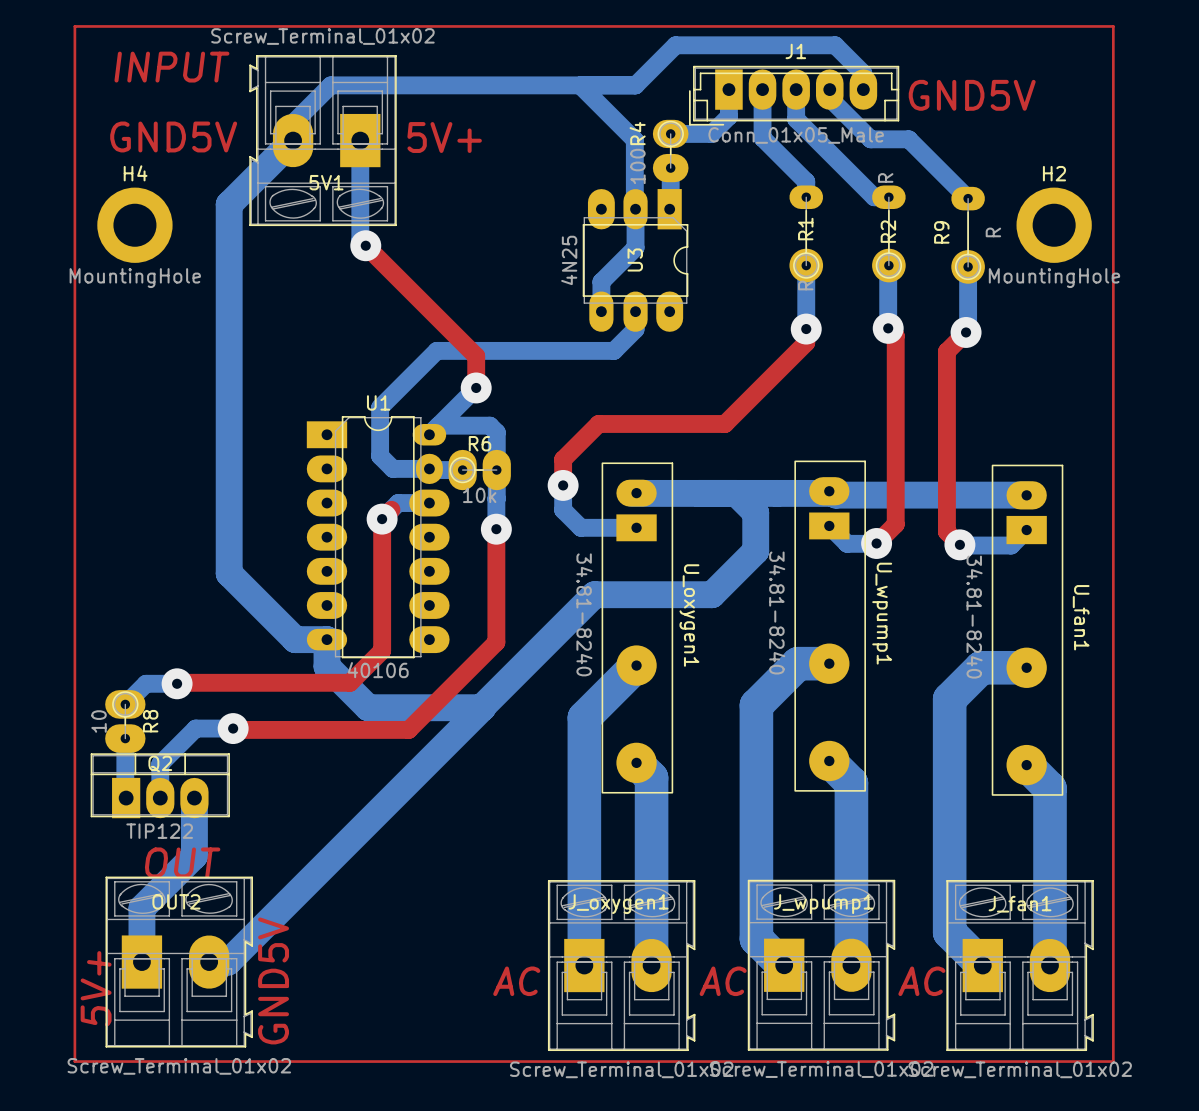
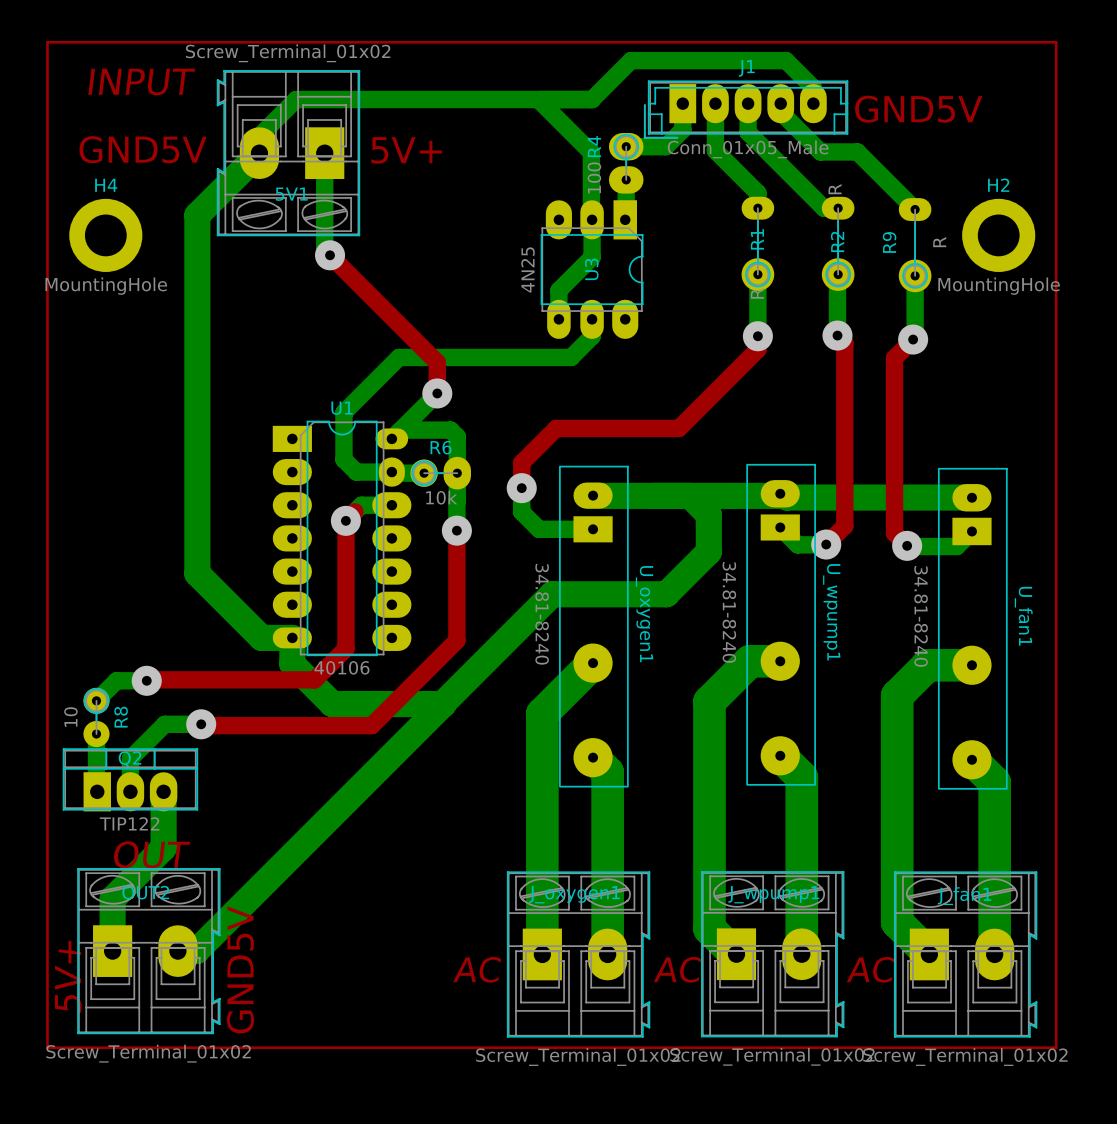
R6 footprint: [448, 449, 511, 491] -> [410, 456, 472, 490]
R8 footprint: [105, 690, 146, 753] -> [83, 687, 110, 748]

